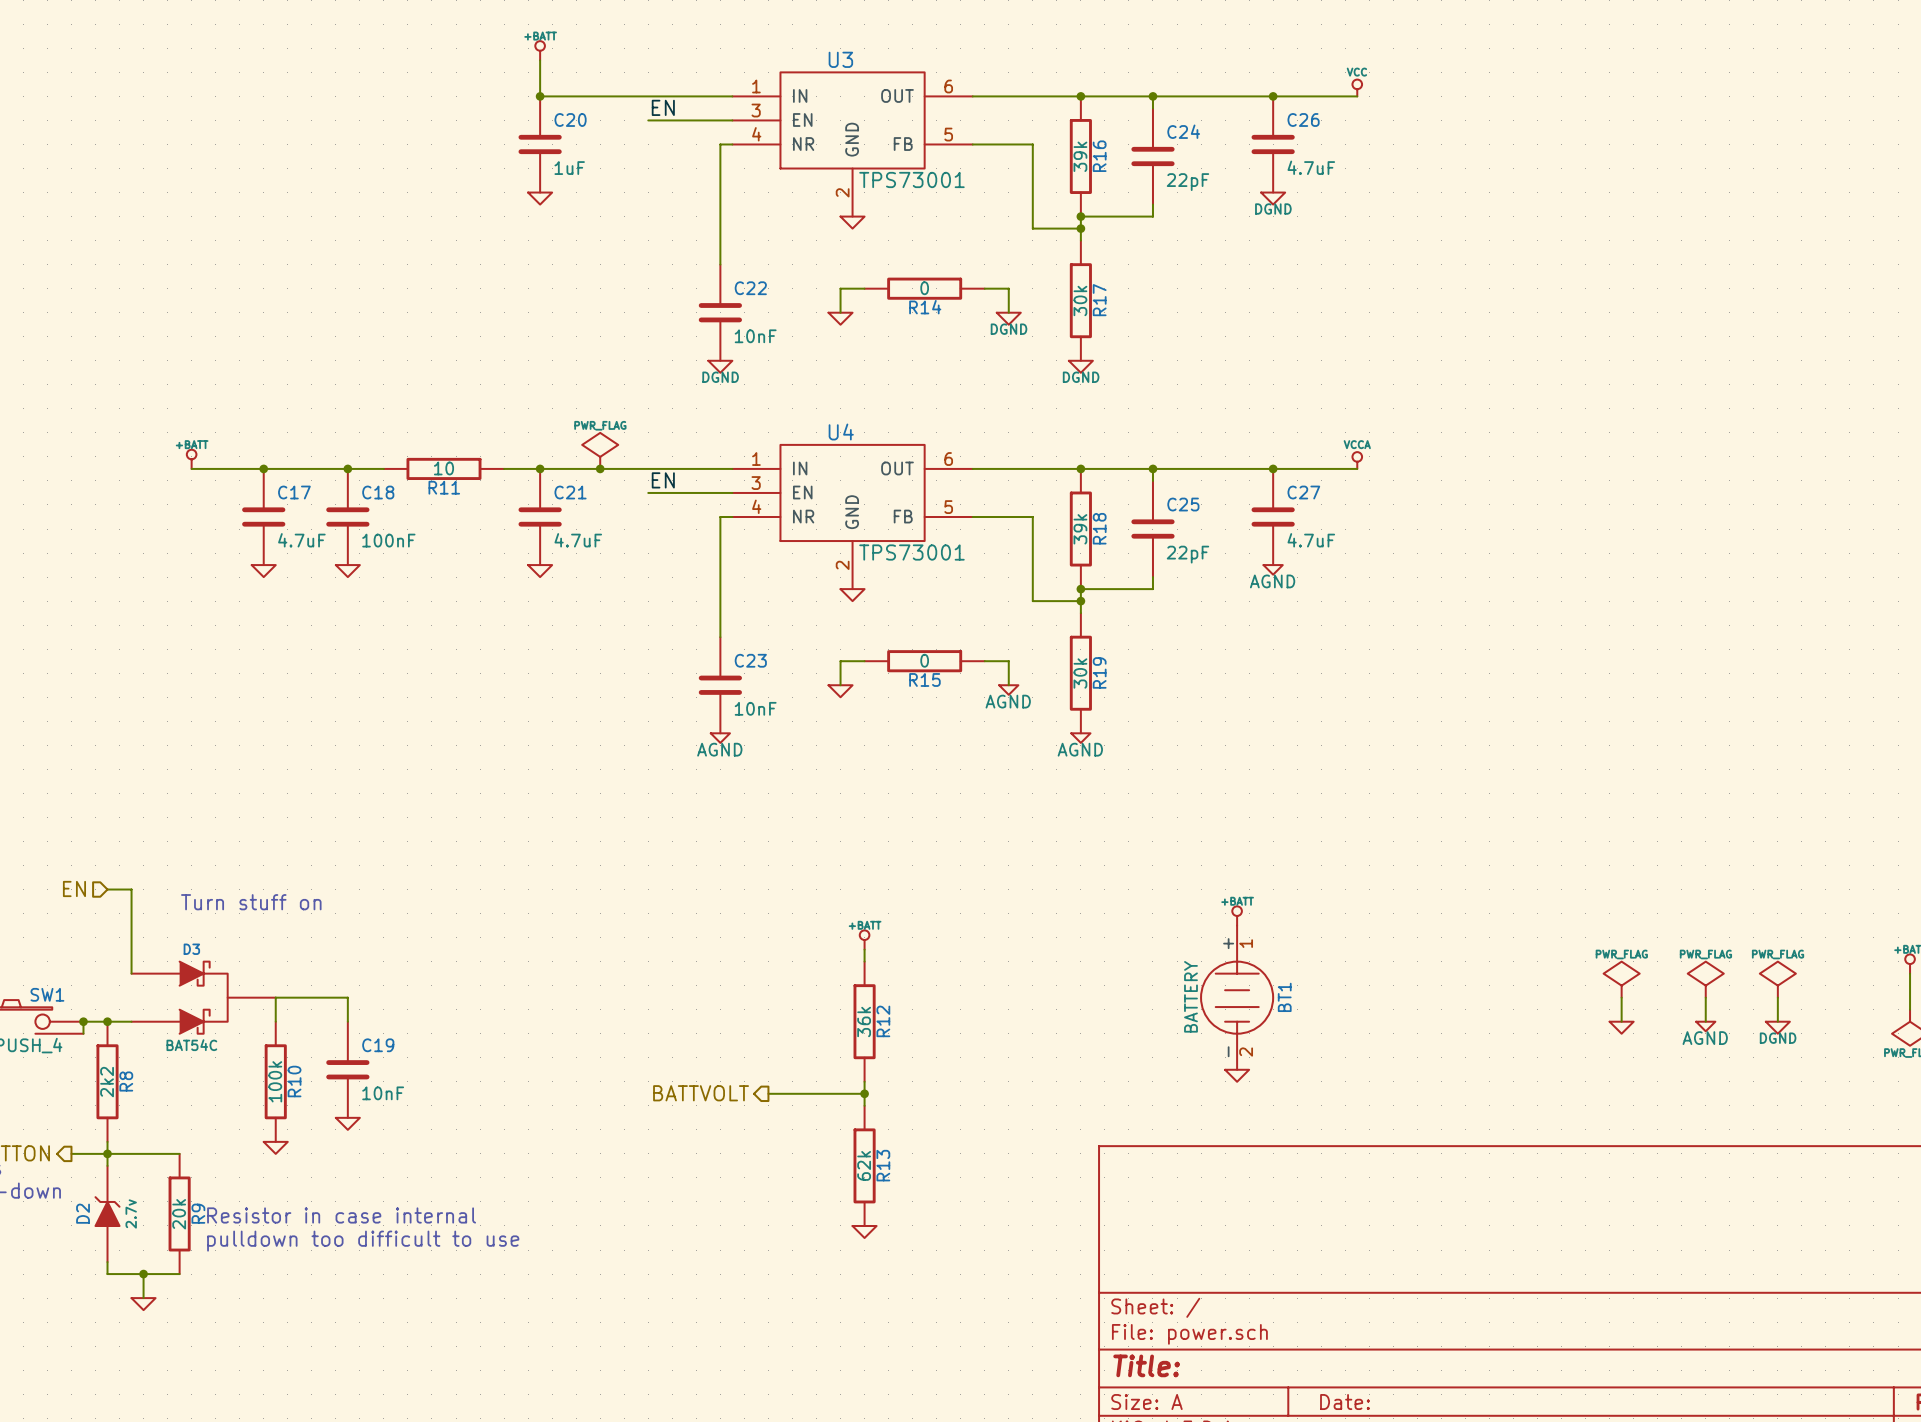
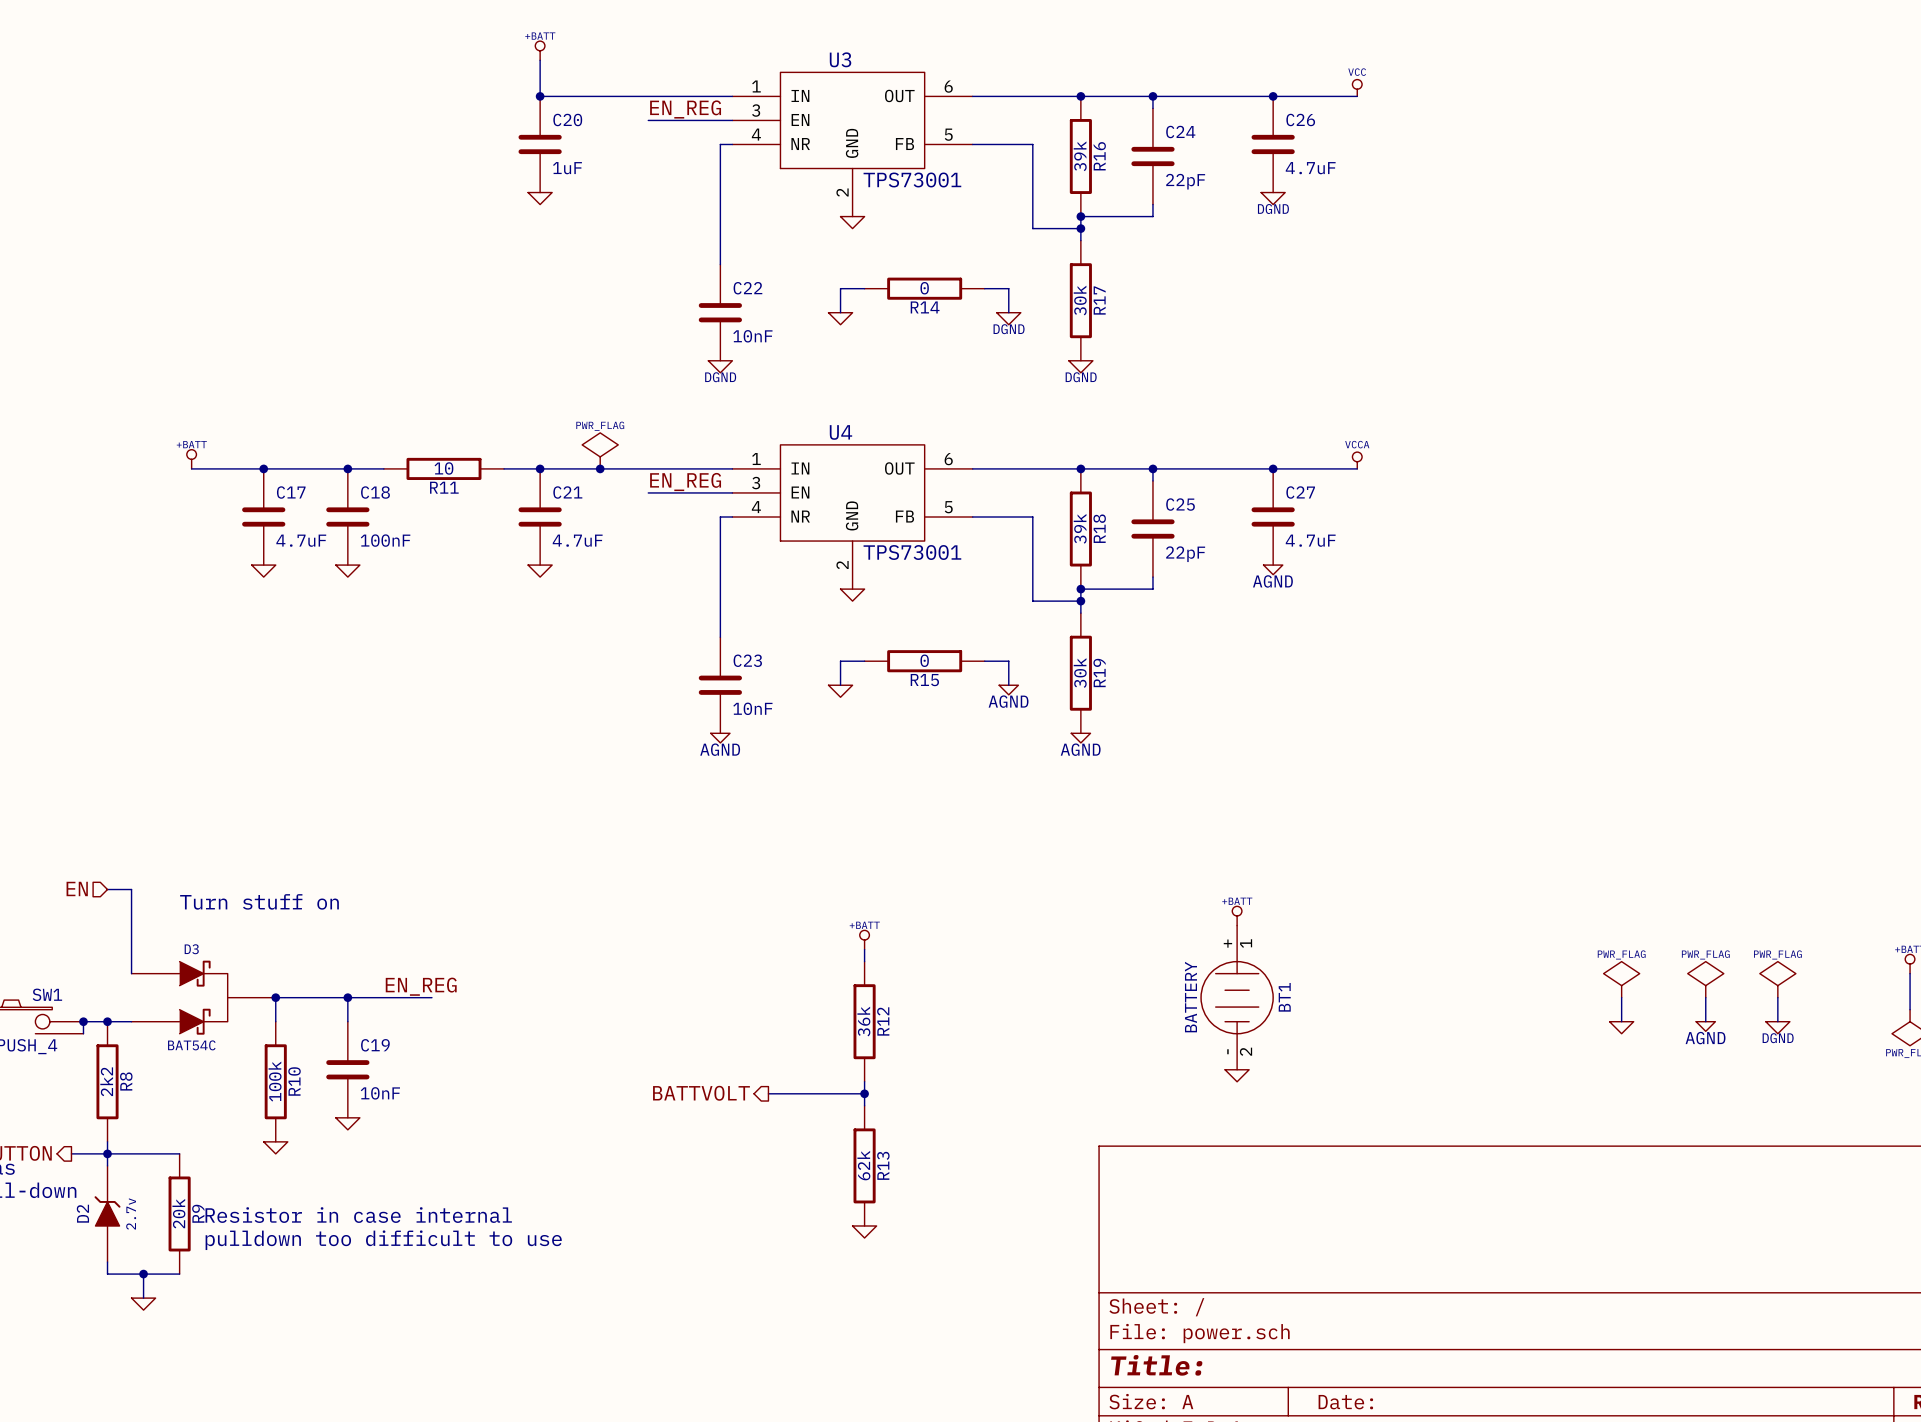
label: EN (663, 107) -> EN_REG (685, 109)
label: EN (663, 480) -> EN_REG (685, 482)
label: none -> EN_REG (421, 986)
junction: none -> (275, 997)
wire: none -> (347, 997) (431, 997)
junction: none -> (347, 997)

